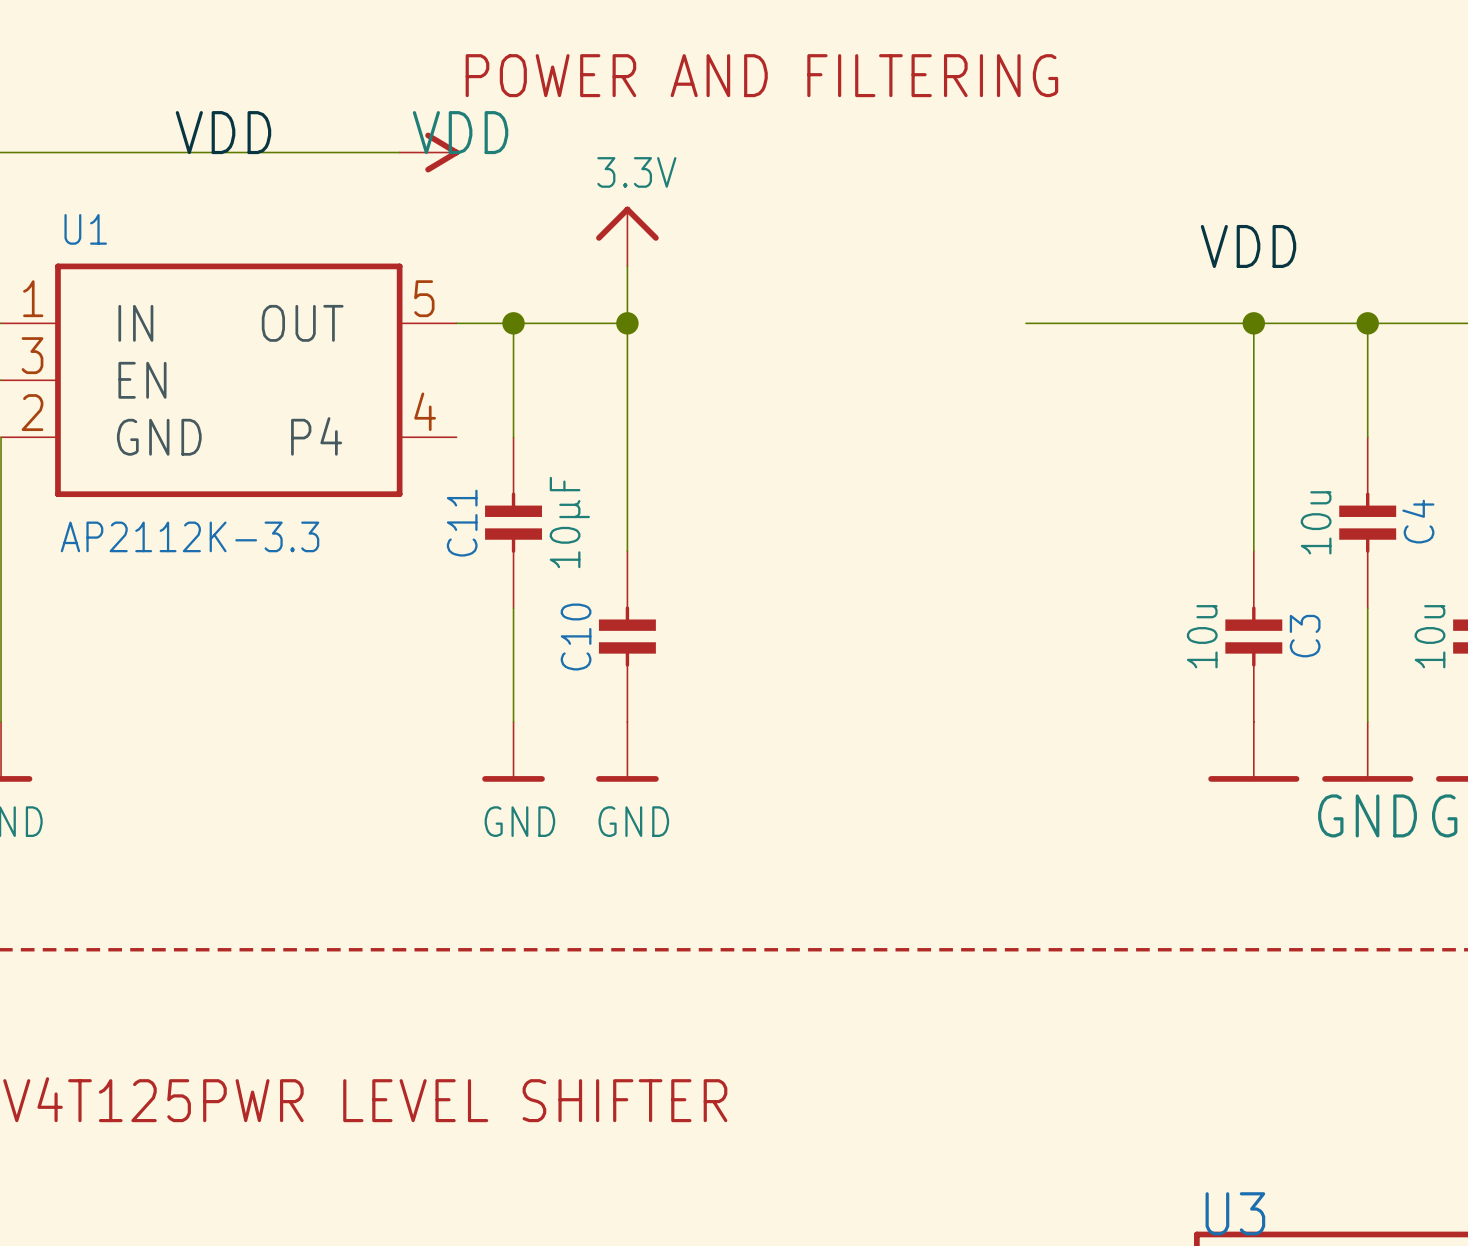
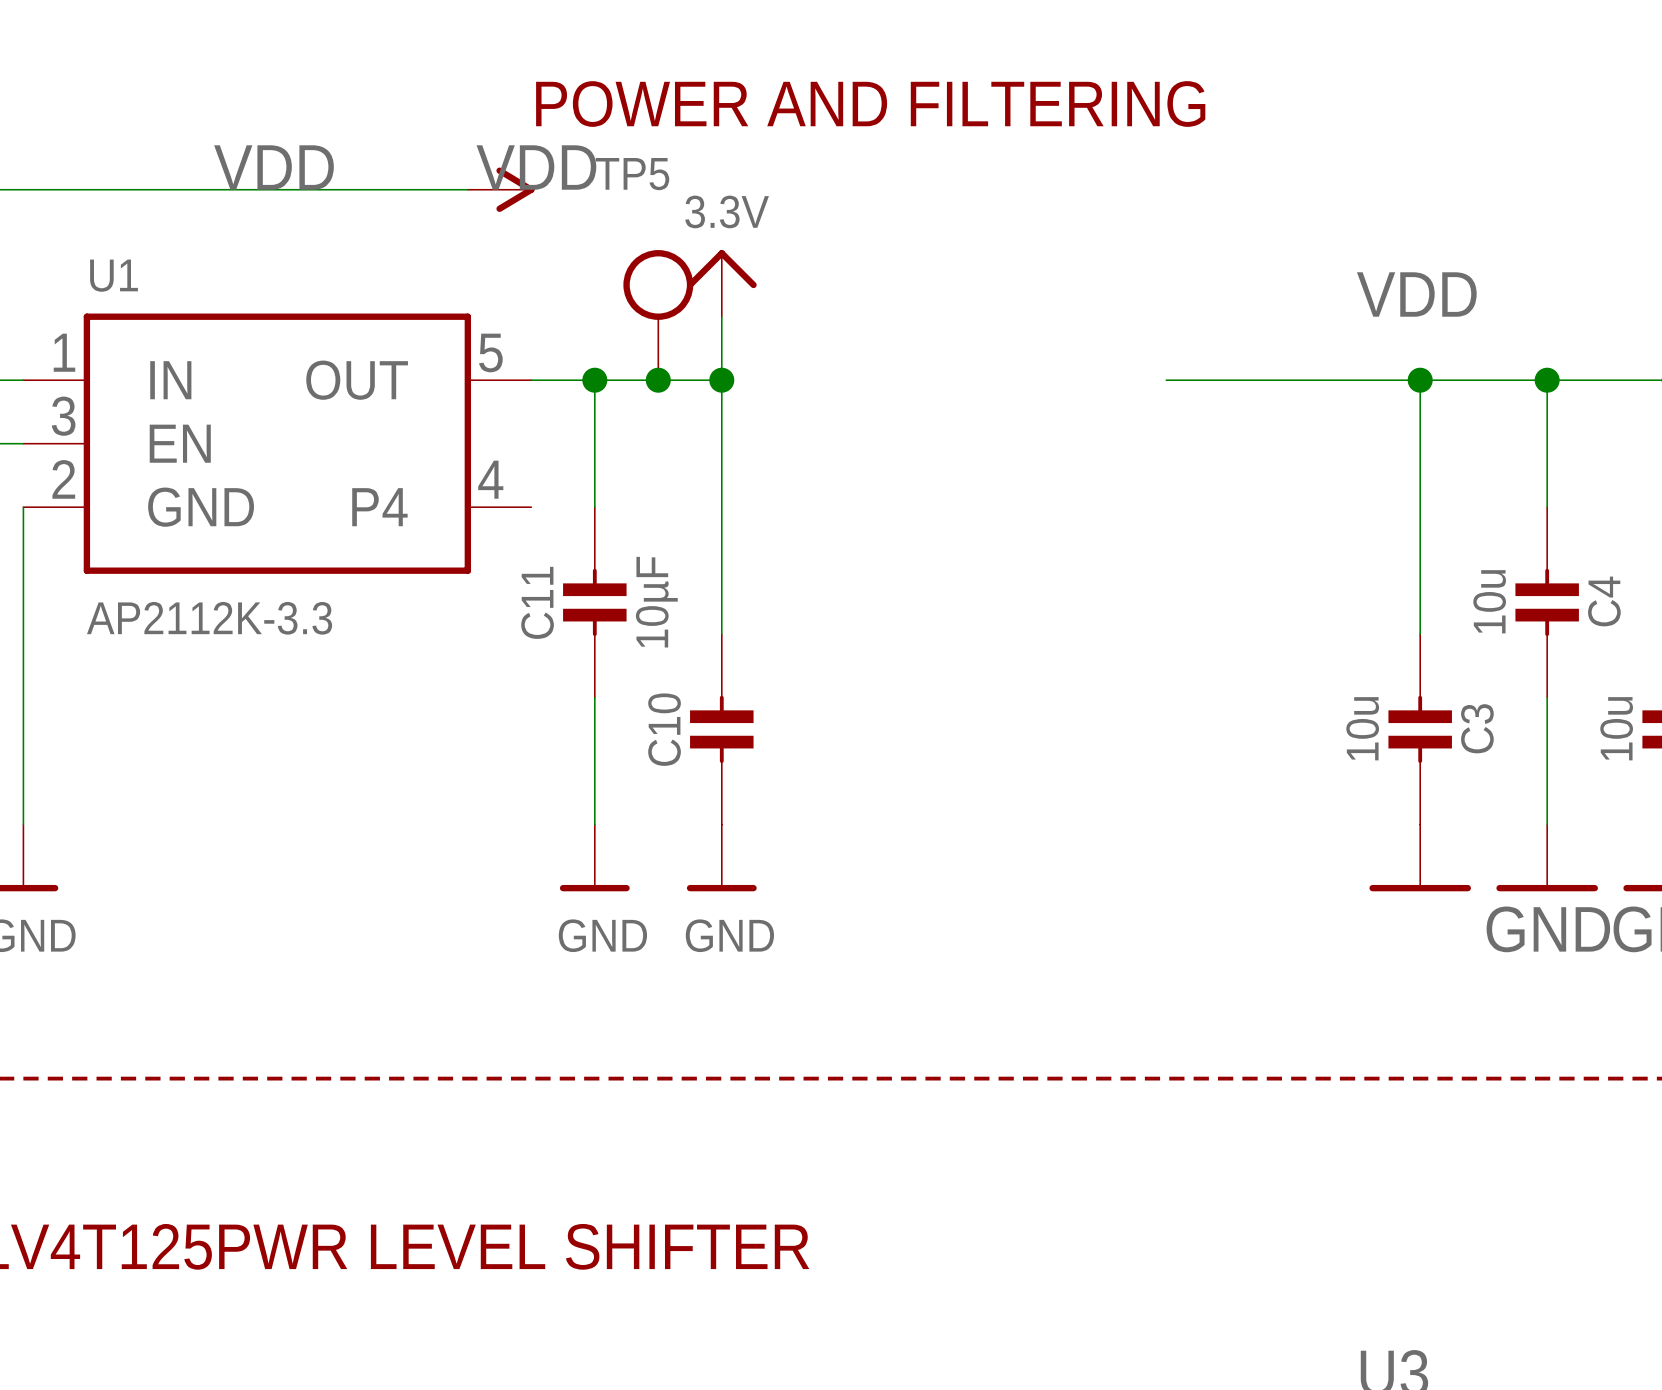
TP5: none -> (658, 315)
junction: none -> (658, 380)

